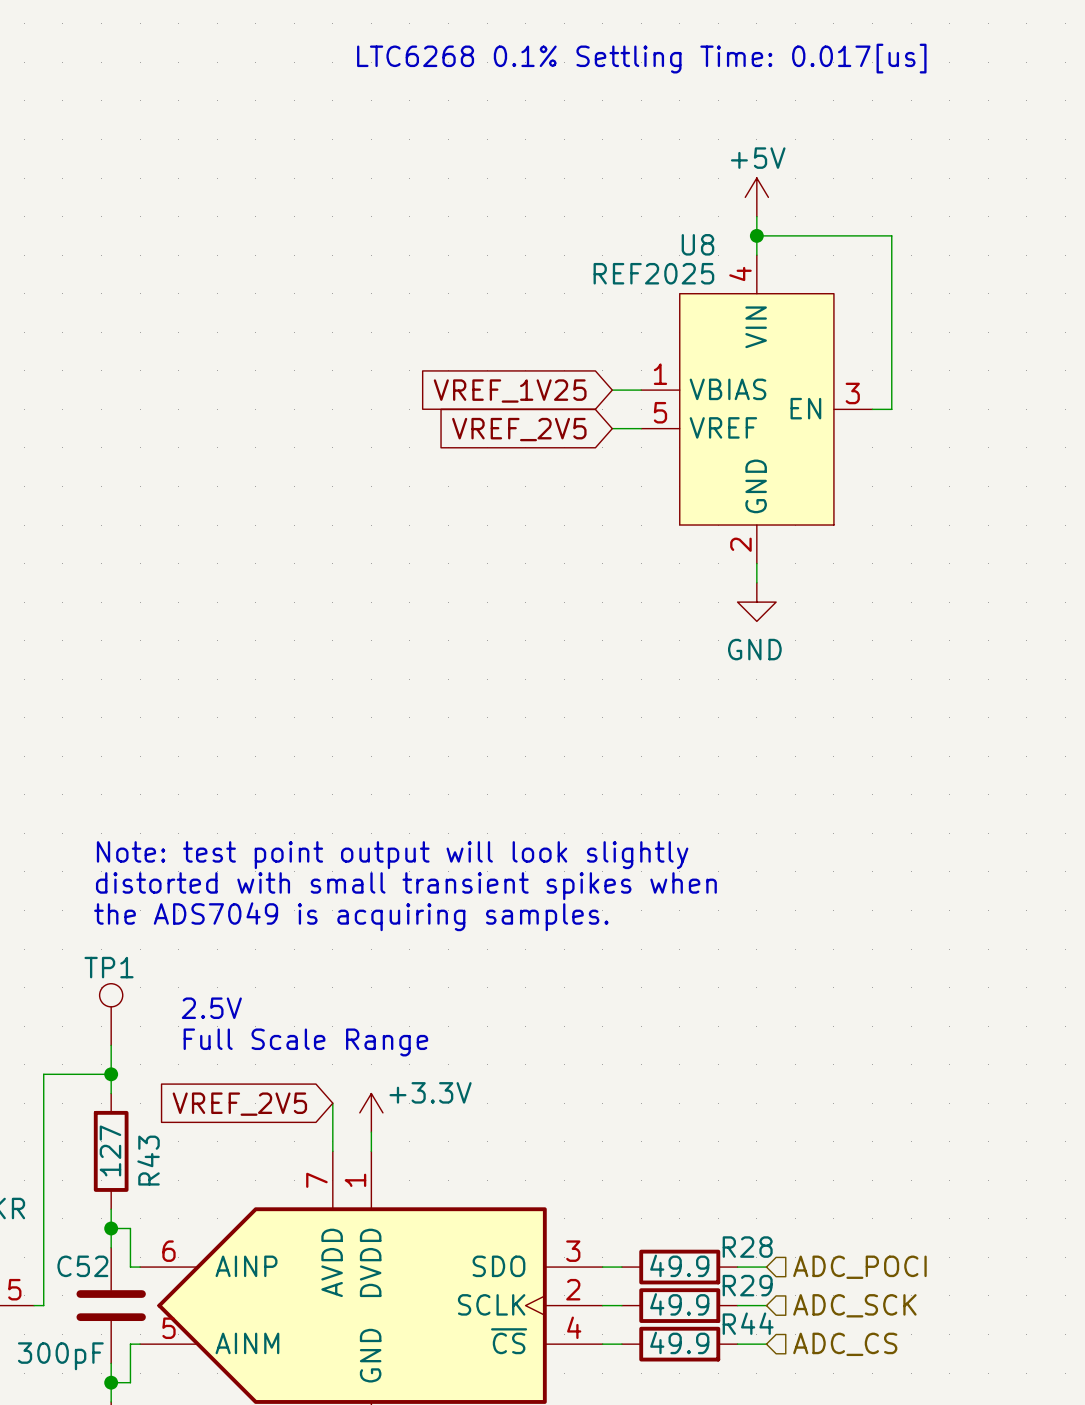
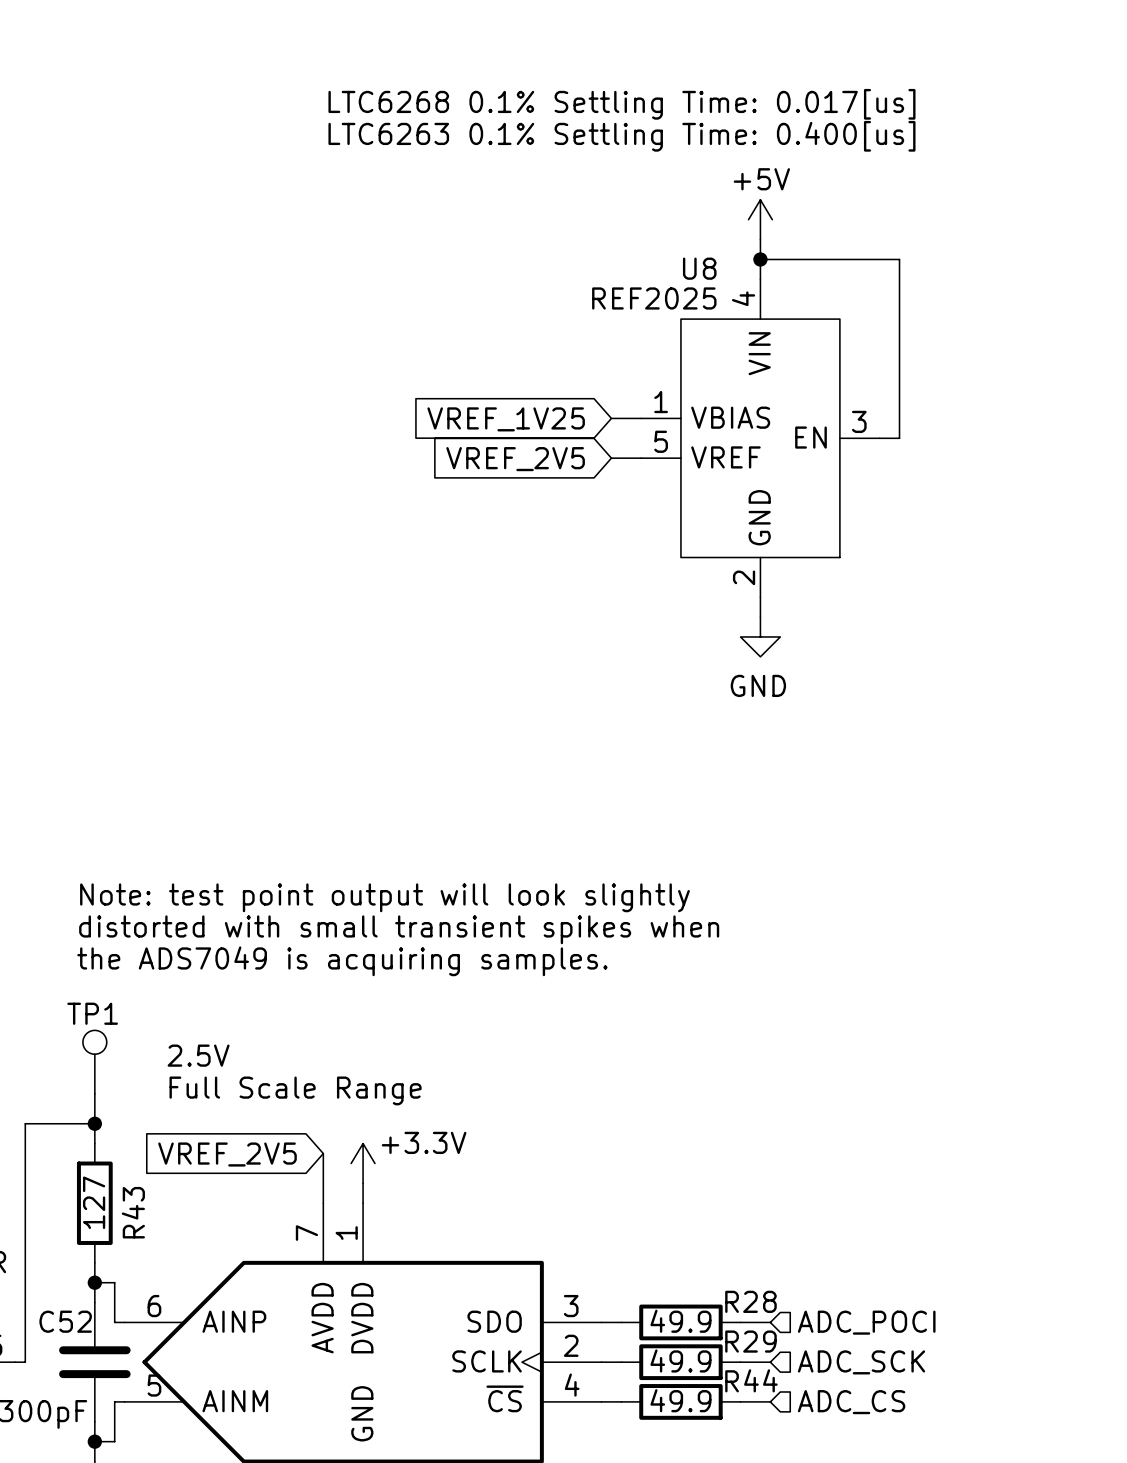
text position: LTC6268 0.1% Settling Time: 0.017[us] (641, 58) -> LTC6268 0.1% Settling Time: 0.017[us] (621, 104)
text: none -> LTC6263 0.1% Settling Time: 0.400[us] (621, 136)

